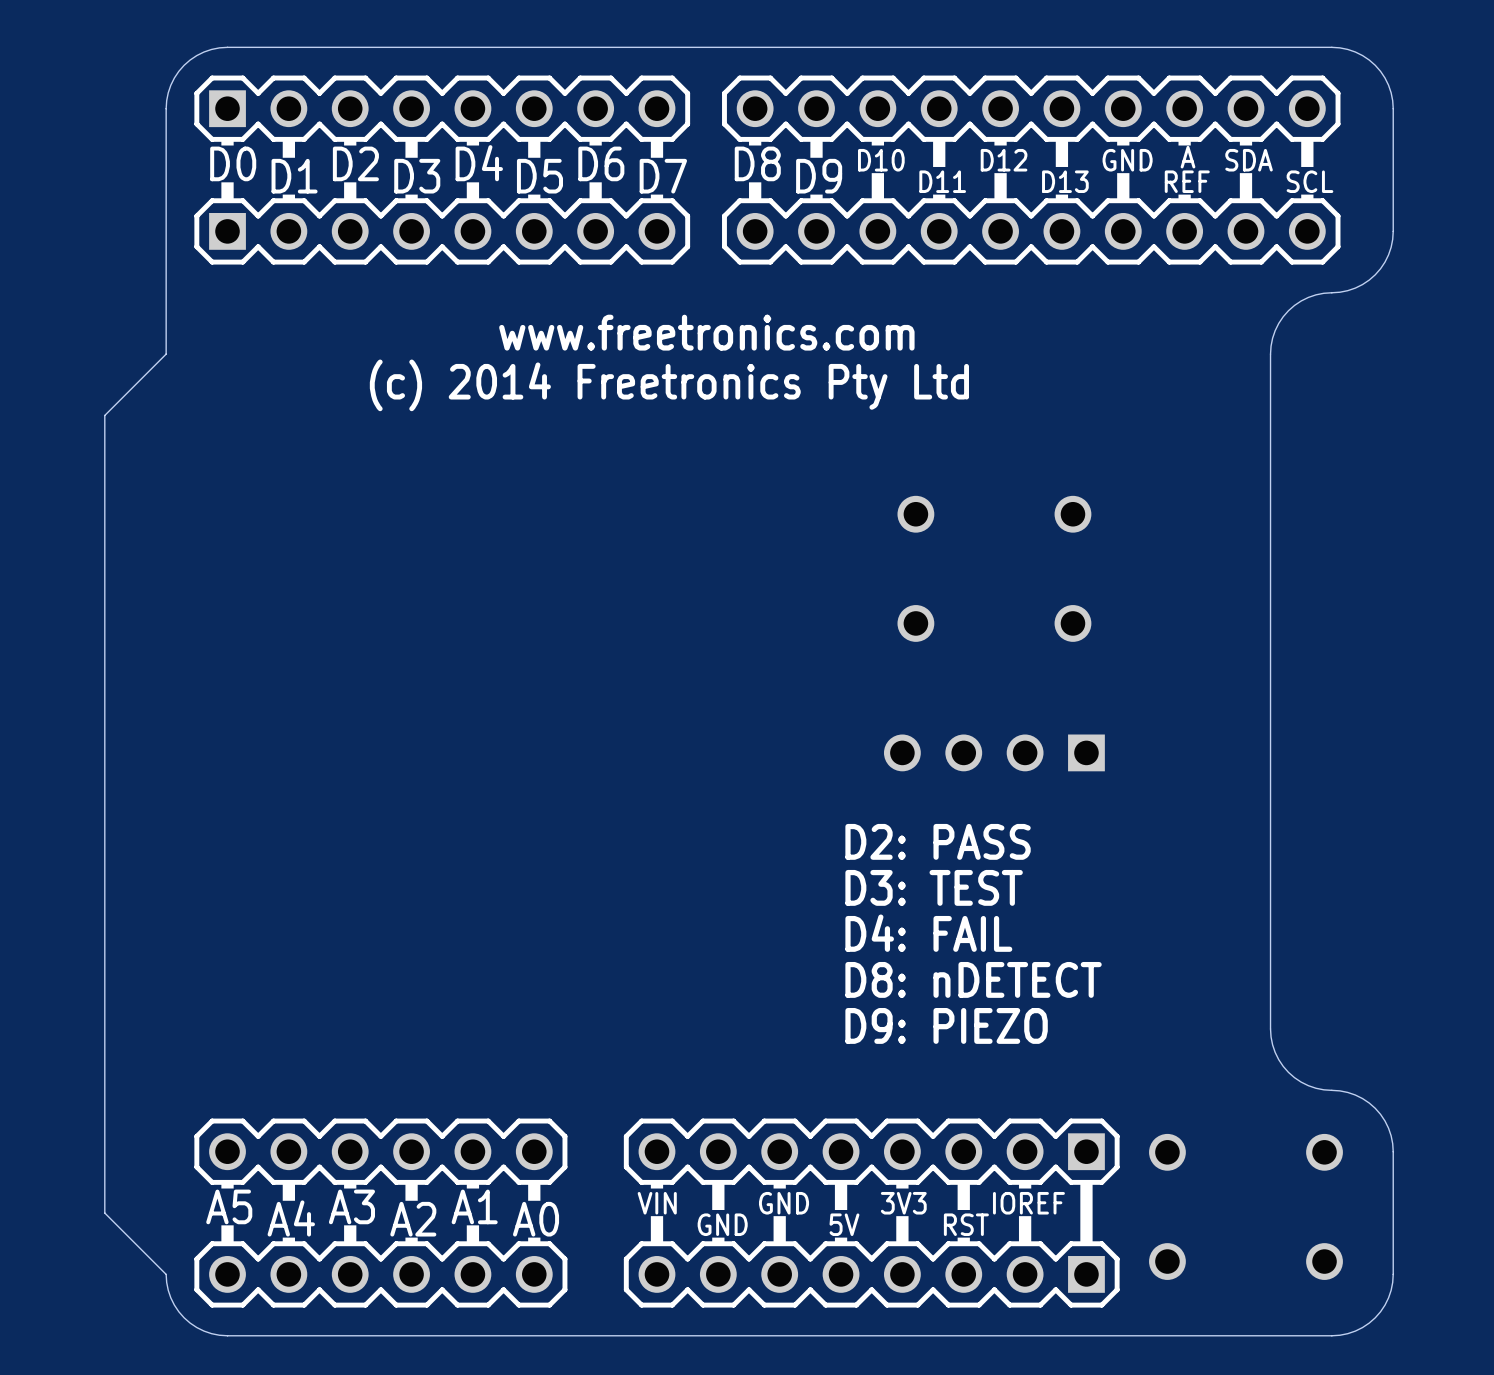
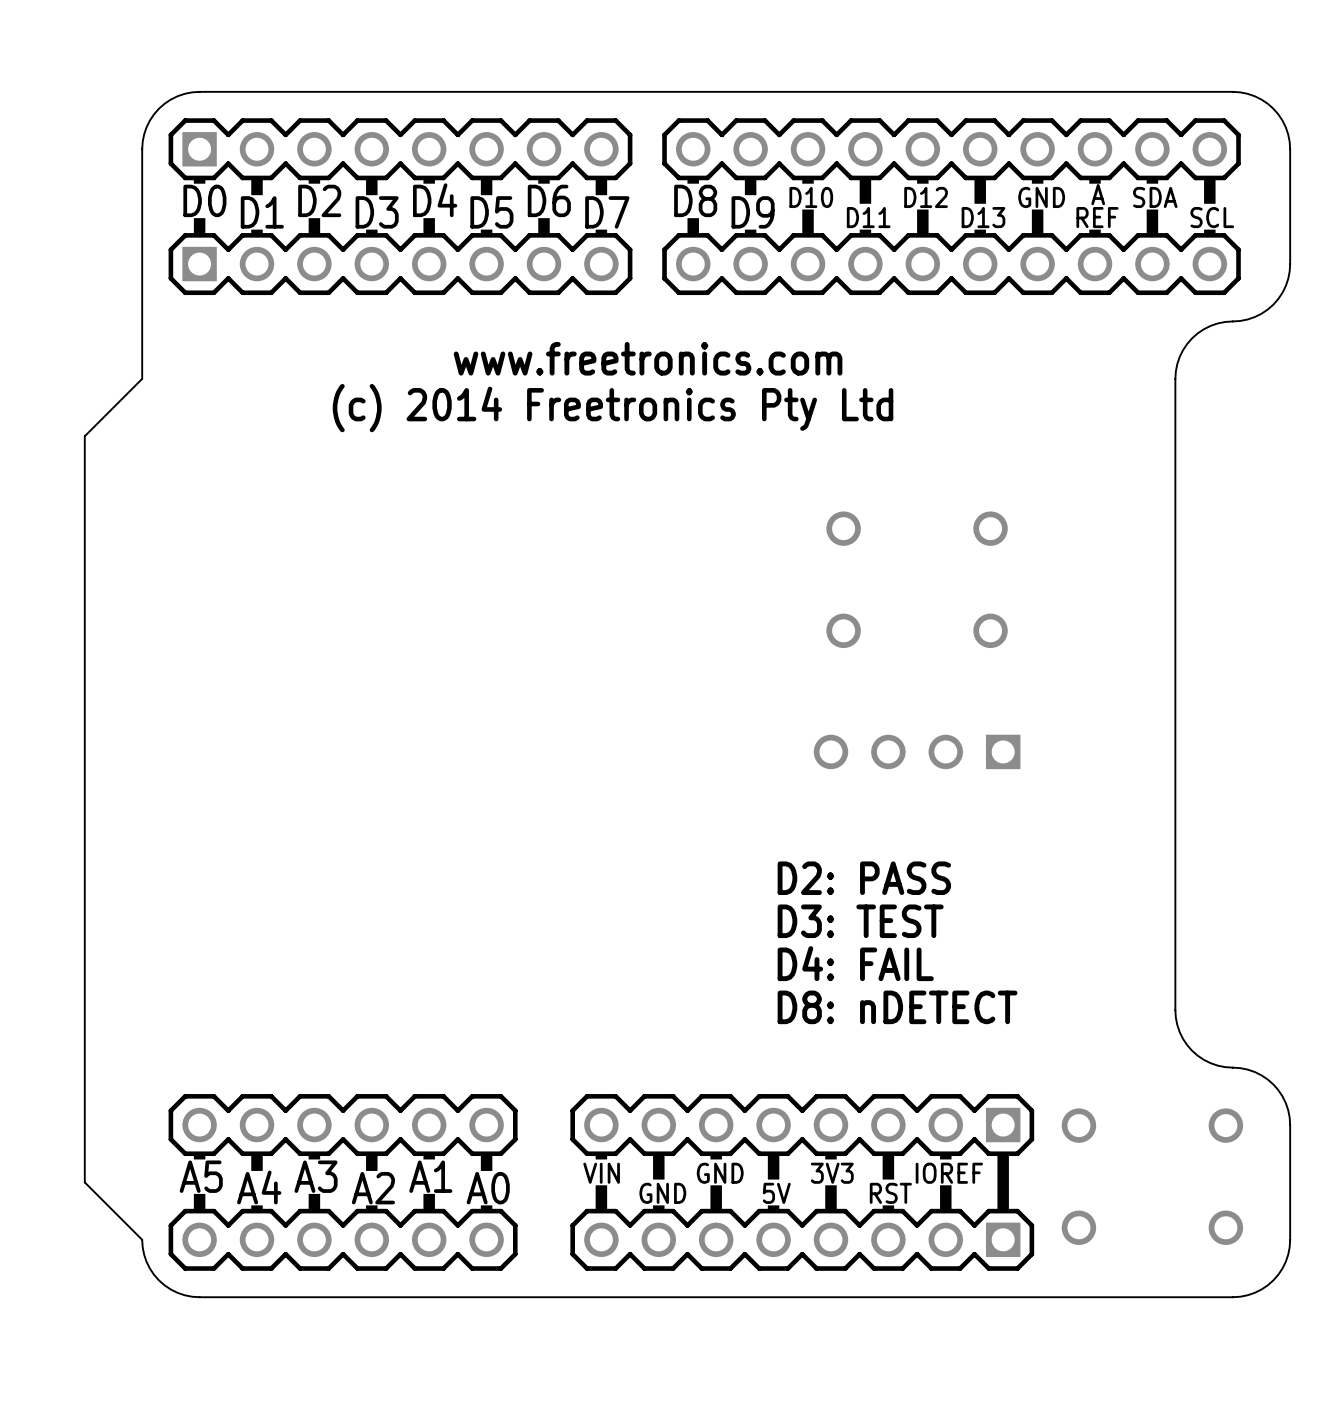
text: D2: PASS (938, 841) -> none
text: D3: TEST (934, 887) -> D2: PASS (864, 878)
text: D4: FAIL (928, 933) -> D3: TEST (860, 921)
text: D8: nDETECT (973, 979) -> D4: FAIL (855, 963)
text: D9: PIEZO (946, 1025) -> D8: nDETECT (897, 1007)

